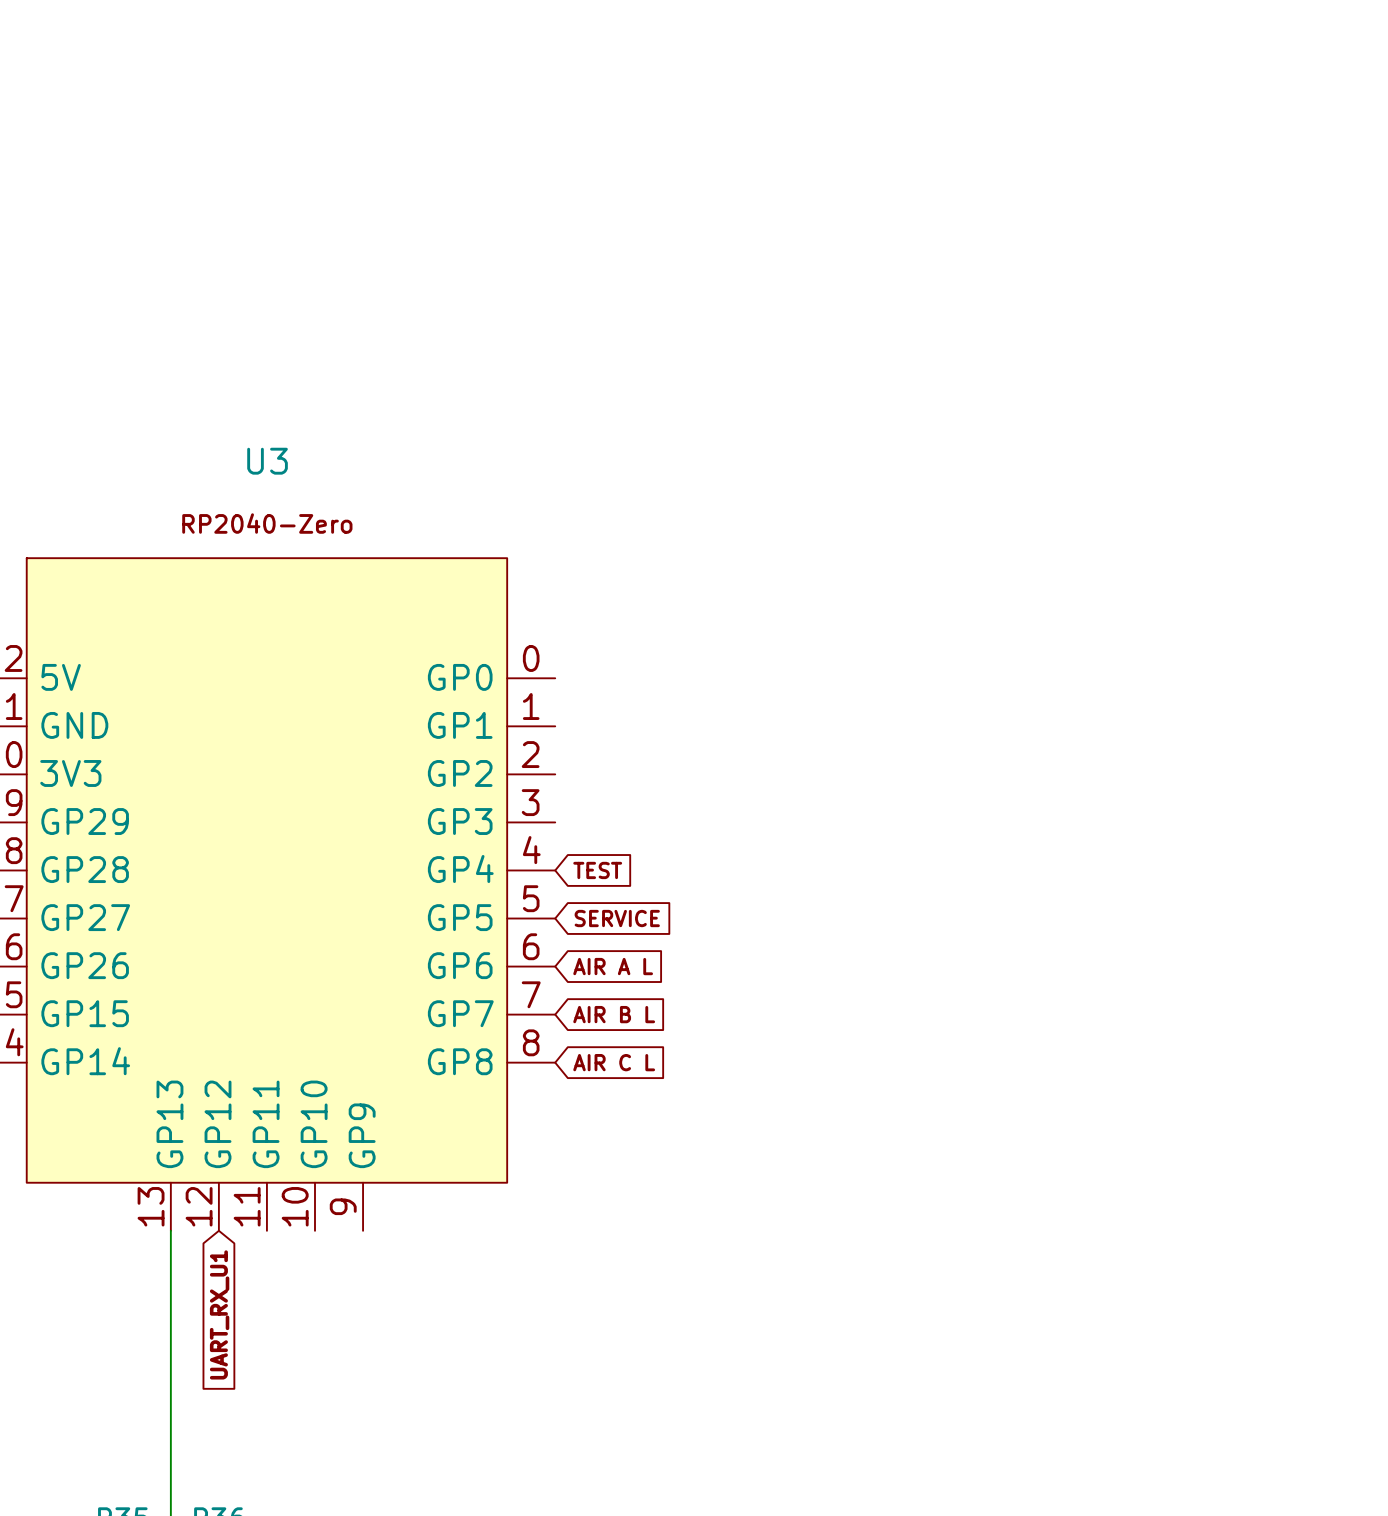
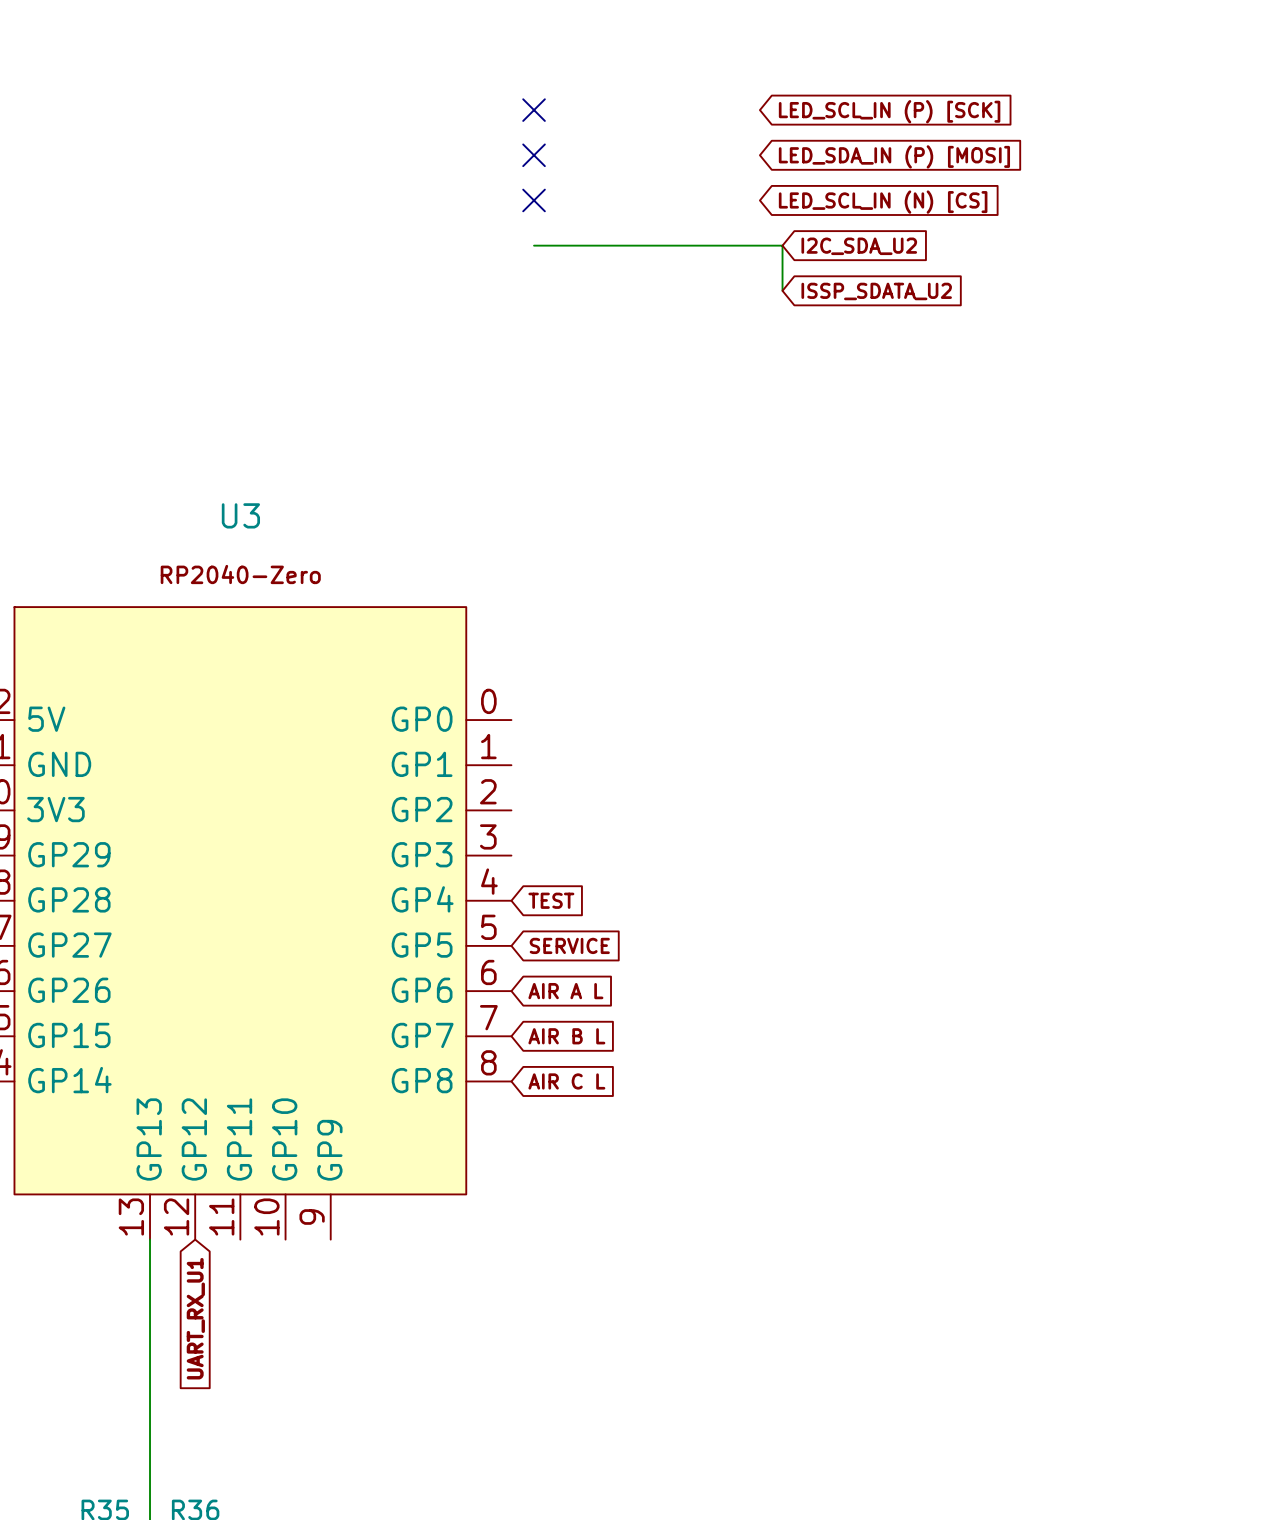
no-connect mark: none -> (534, 110)
global label: none -> LED_SCL_IN (P) [SCK] (889, 111)
no-connect mark: none -> (534, 155)
global label: none -> LED_SDA_IN (P) [MOSI] (894, 156)
no-connect mark: none -> (534, 200)
global label: none -> LED_SCL_IN (N) [CS] (883, 202)
wire: none -> (534, 245) (782, 245) (782, 290)
global label: none -> I2C_SDA_U2 (859, 246)
global label: none -> ISSP_SDATA_U2 (876, 291)

